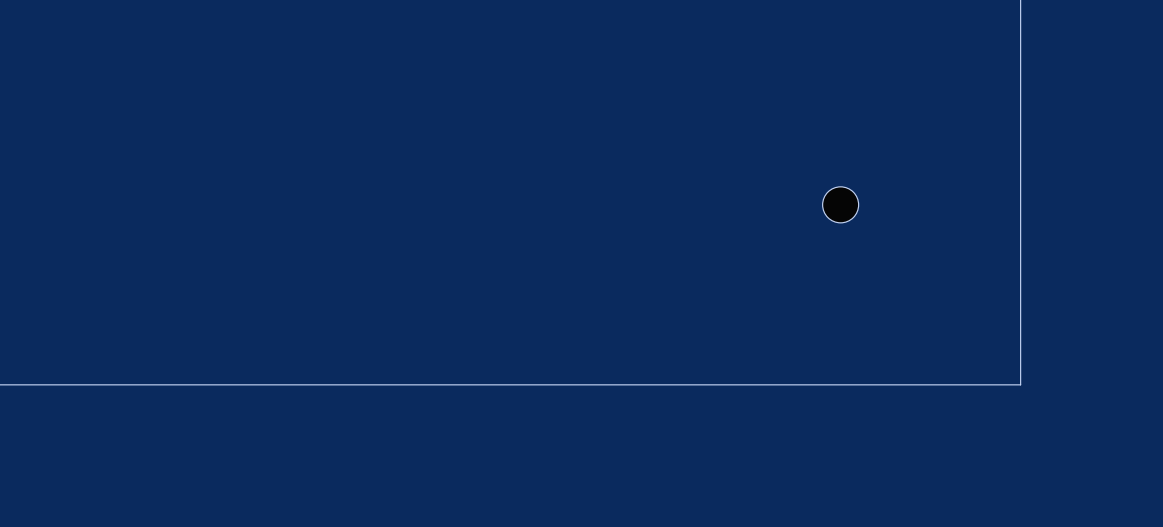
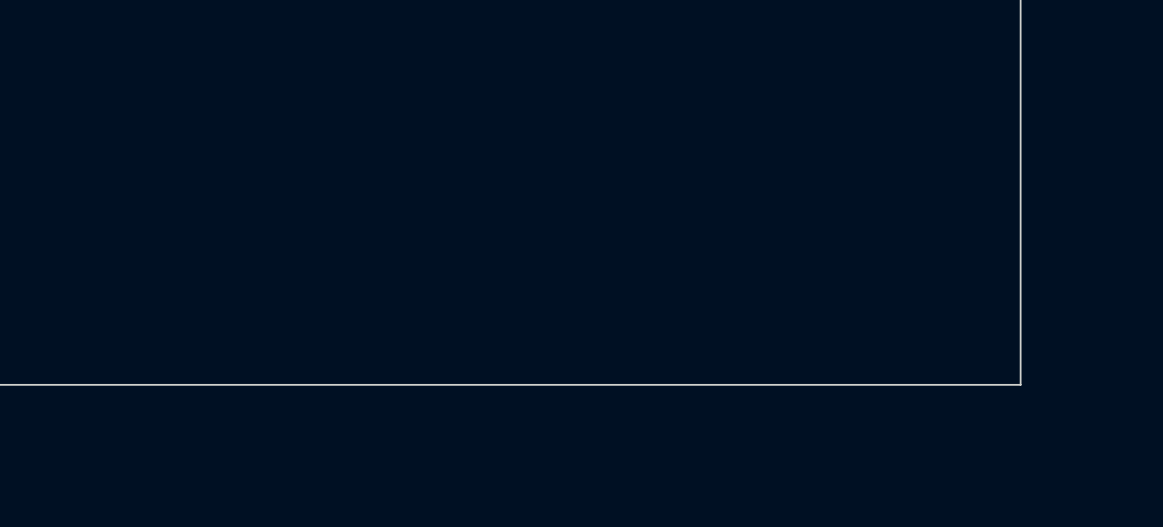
hole: (840, 204) -> none

